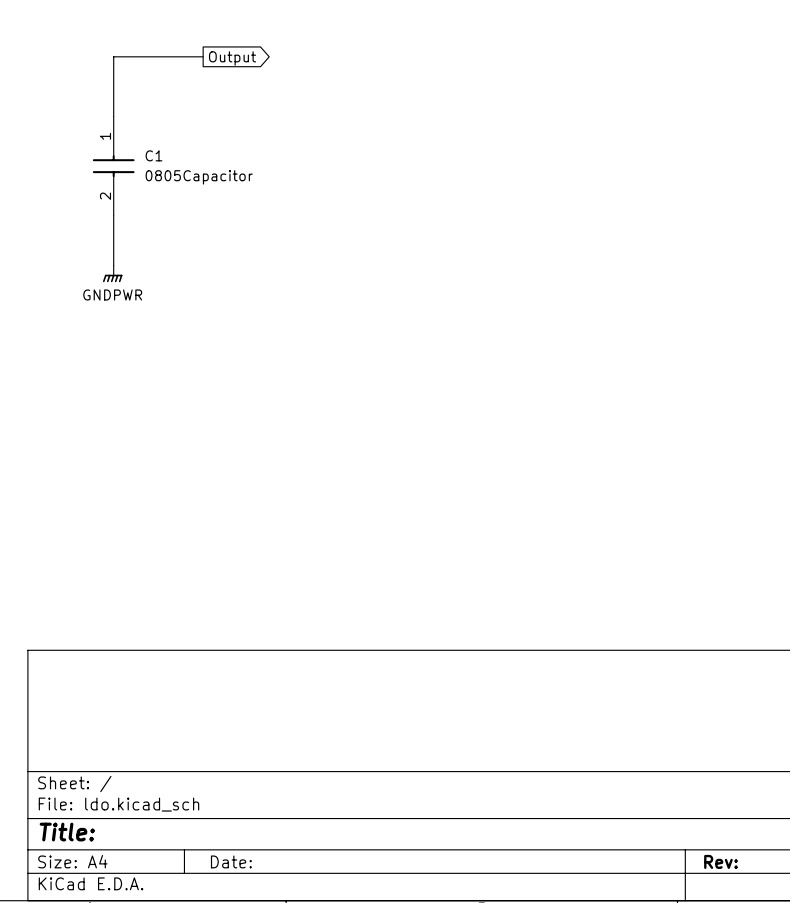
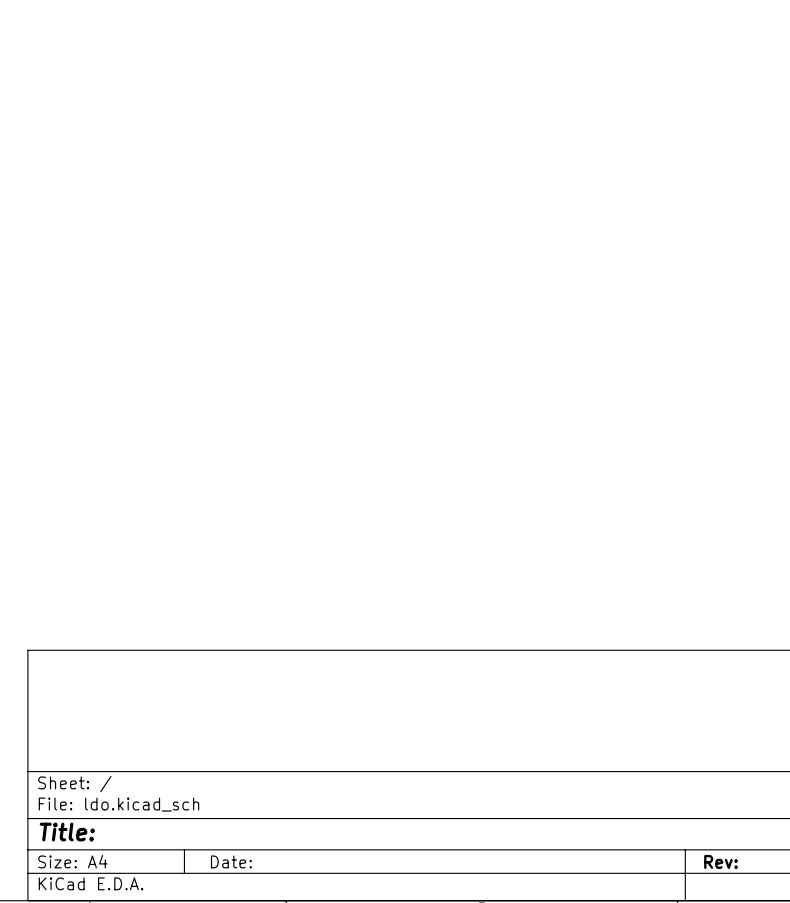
wire: (203, 56) (113, 56) (113, 116) -> none
global label: Output (232, 58) -> none
C1: 0805Capacitor (113, 166) -> none
wire: (113, 215) (113, 265) -> none
power symbol: GNDPWR (112, 273) -> none

